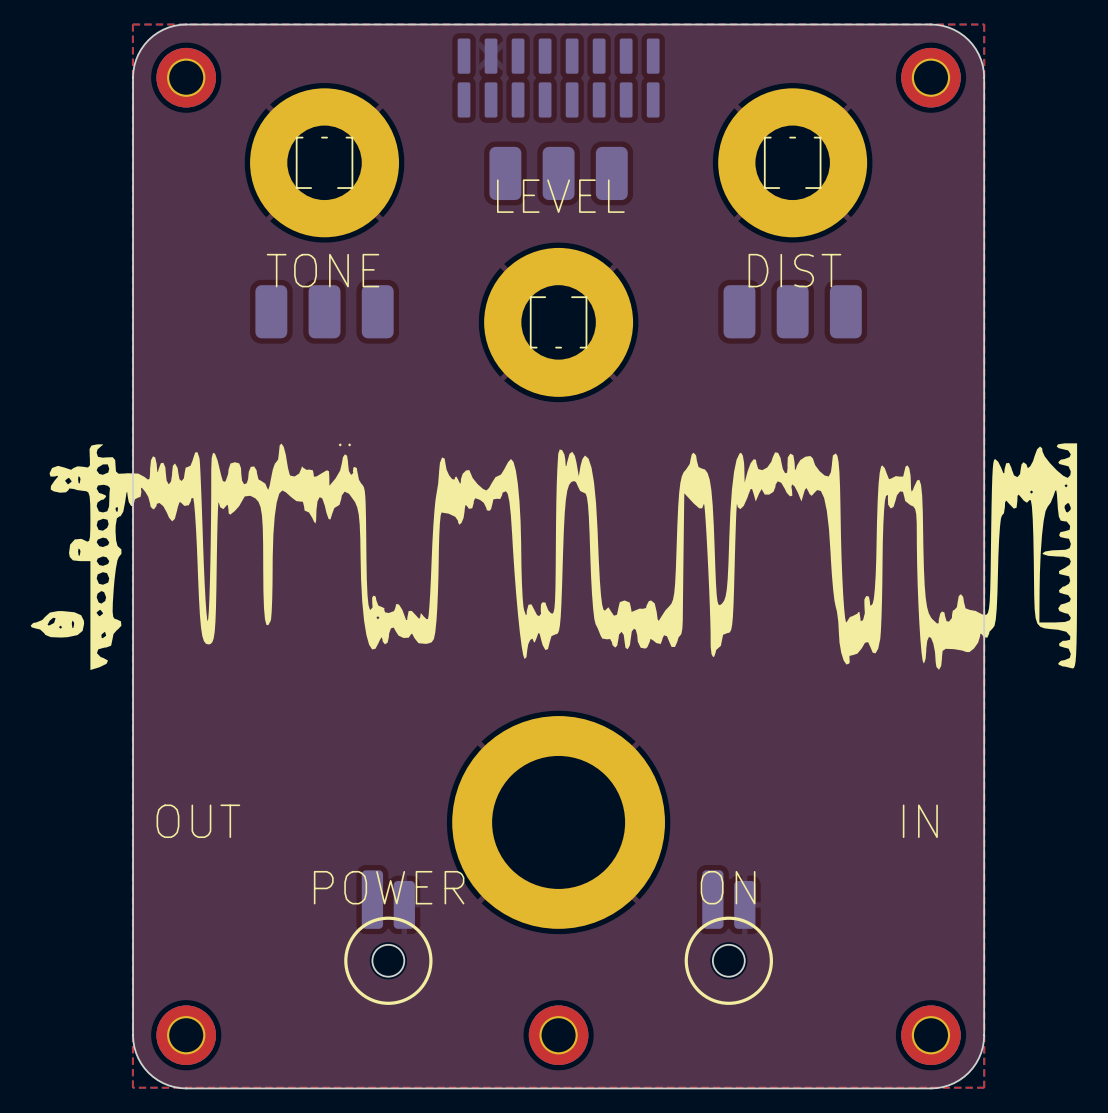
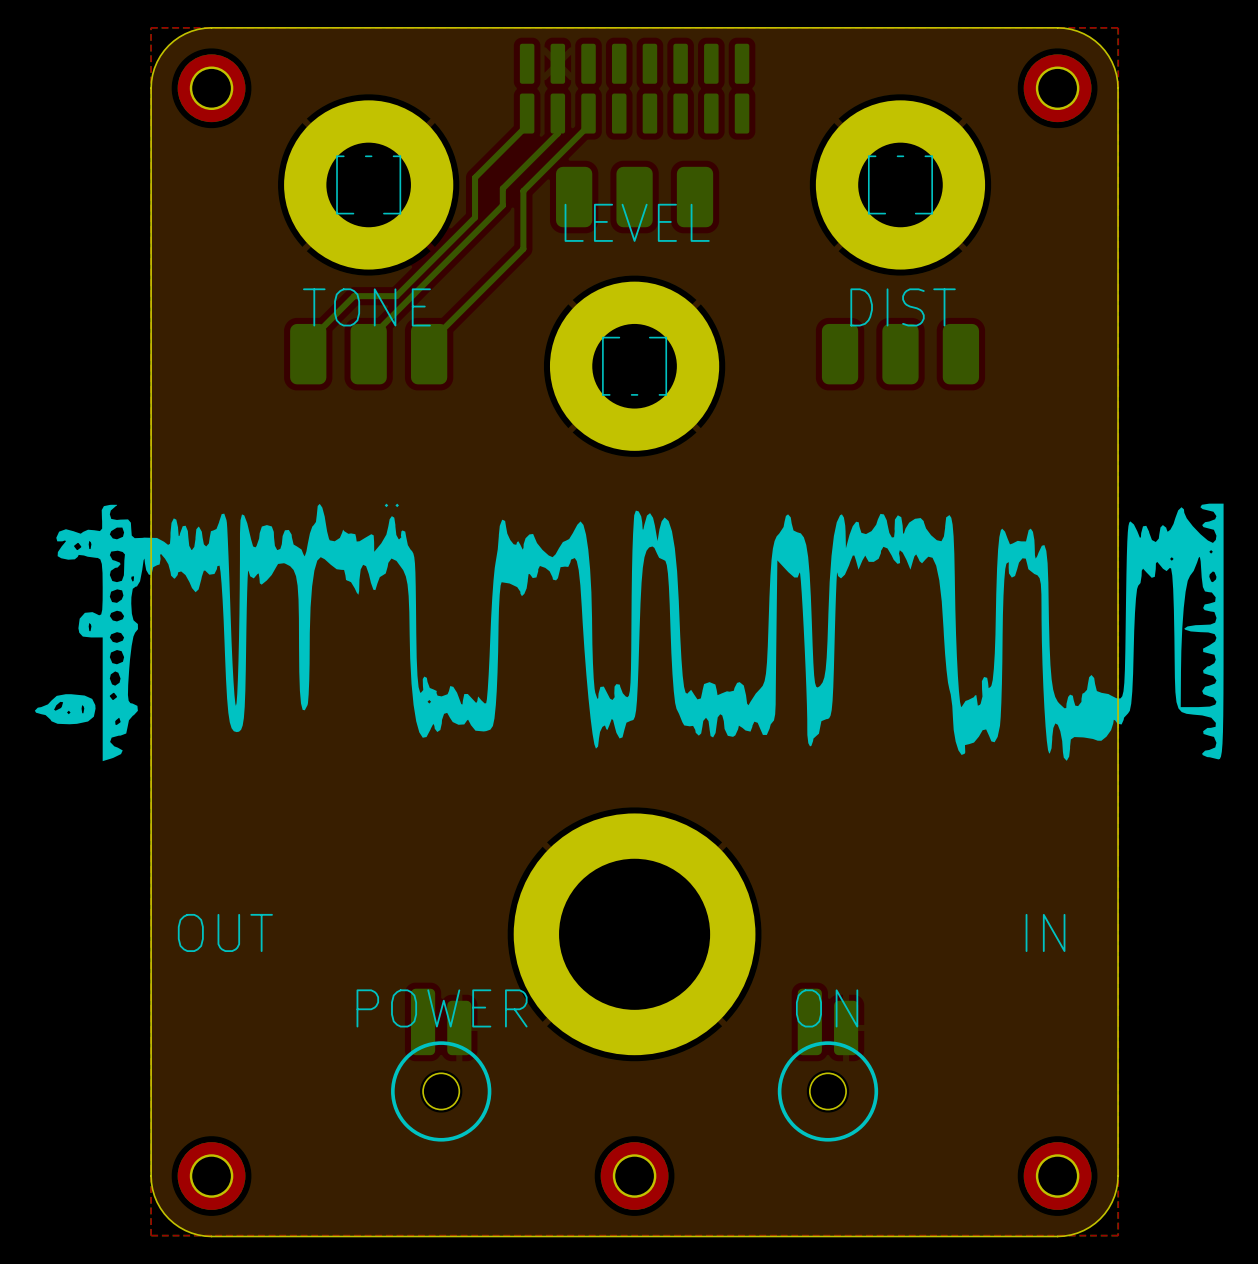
bottom track: none -> (527, 113) (527, 125) (475, 177) (475, 217) (396, 296) (354, 296) (308, 342) (308, 354)
bottom track: none -> (557, 113) (557, 133) (502, 188) (502, 205) (368, 339) (368, 354)
bottom track: none -> (588, 113) (588, 125) (523, 190) (523, 249) (429, 343) (429, 354)

